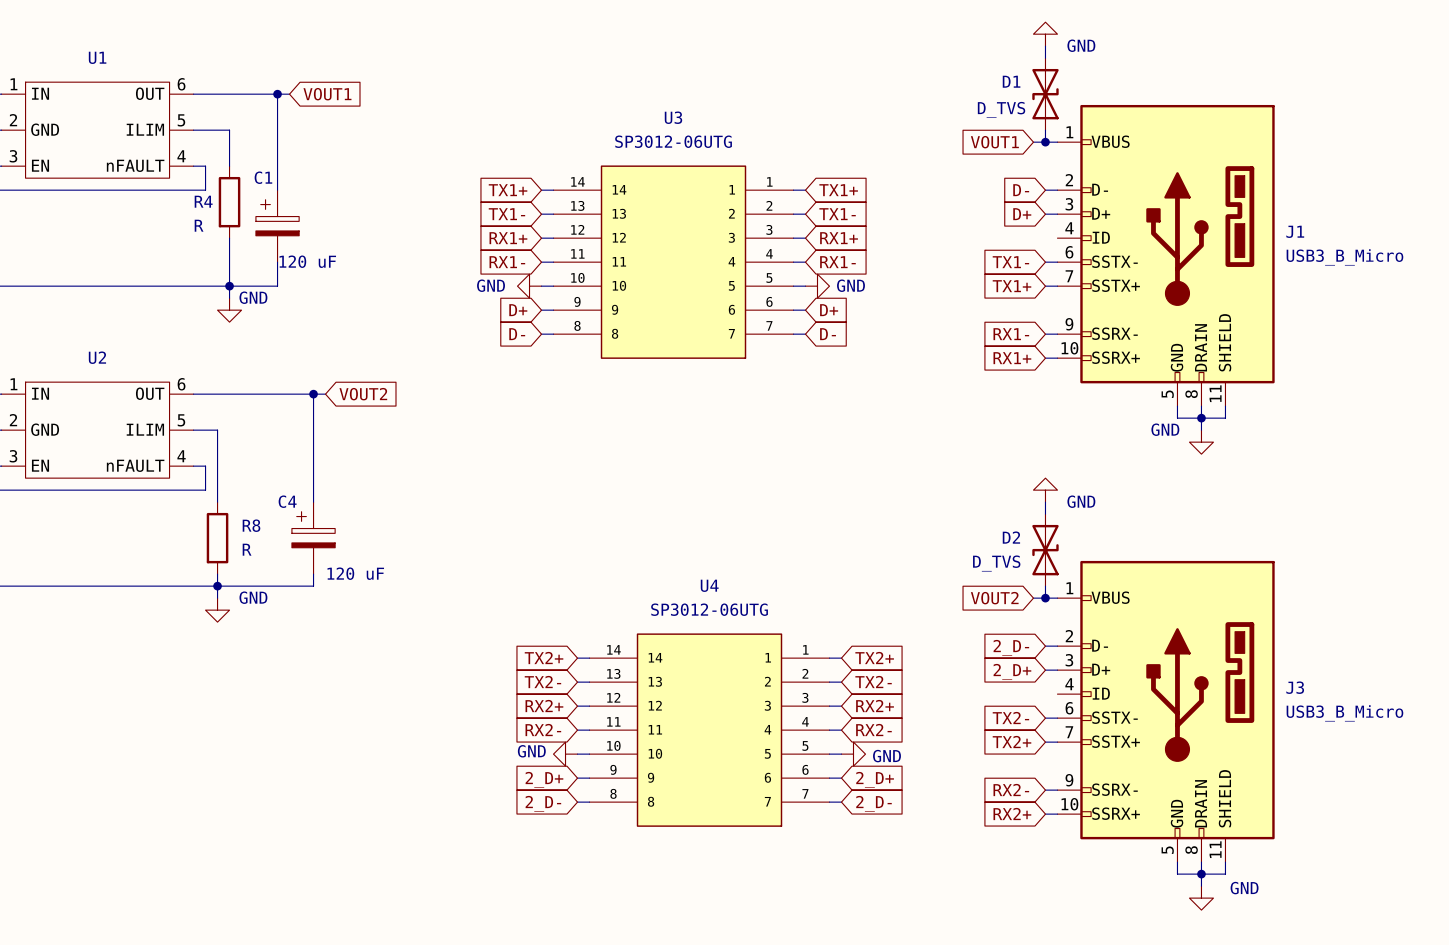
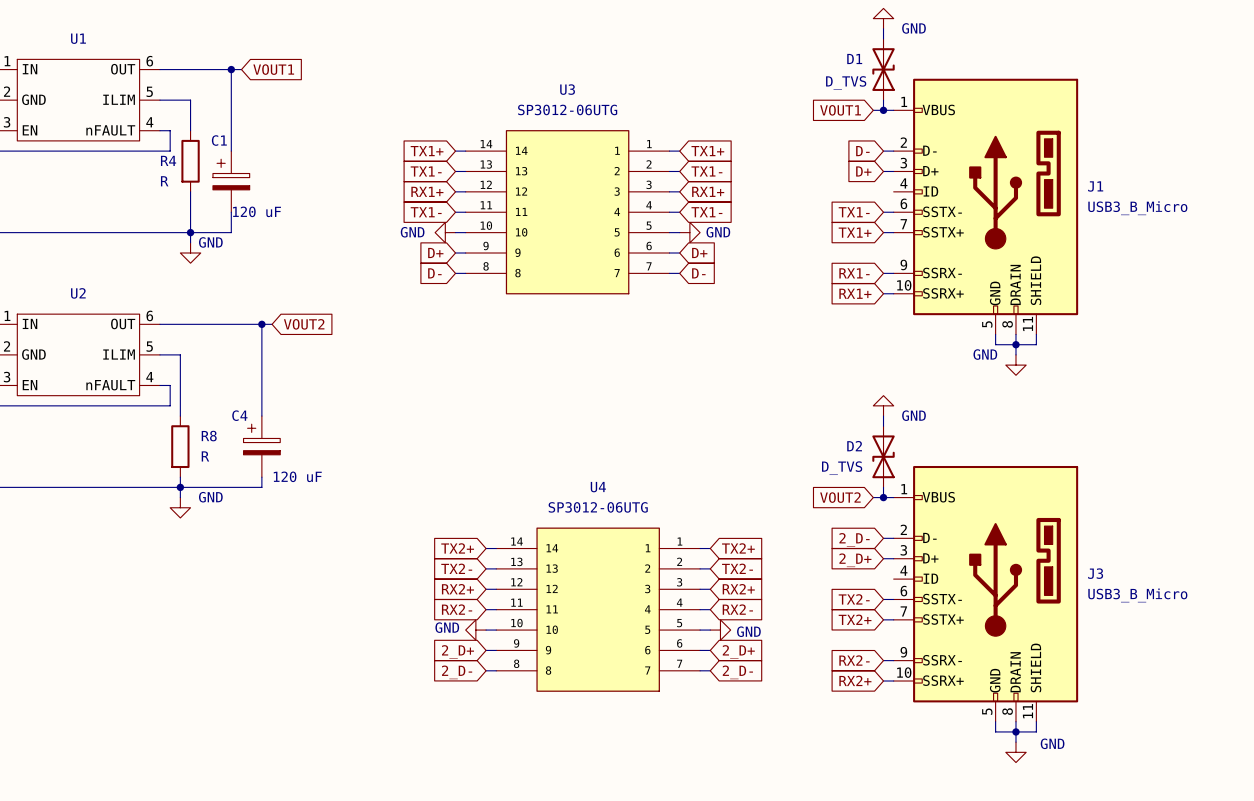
global label: RX1- (507, 262) -> TX1- (426, 212)
global label: RX1- (837, 262) -> TX1- (706, 212)

